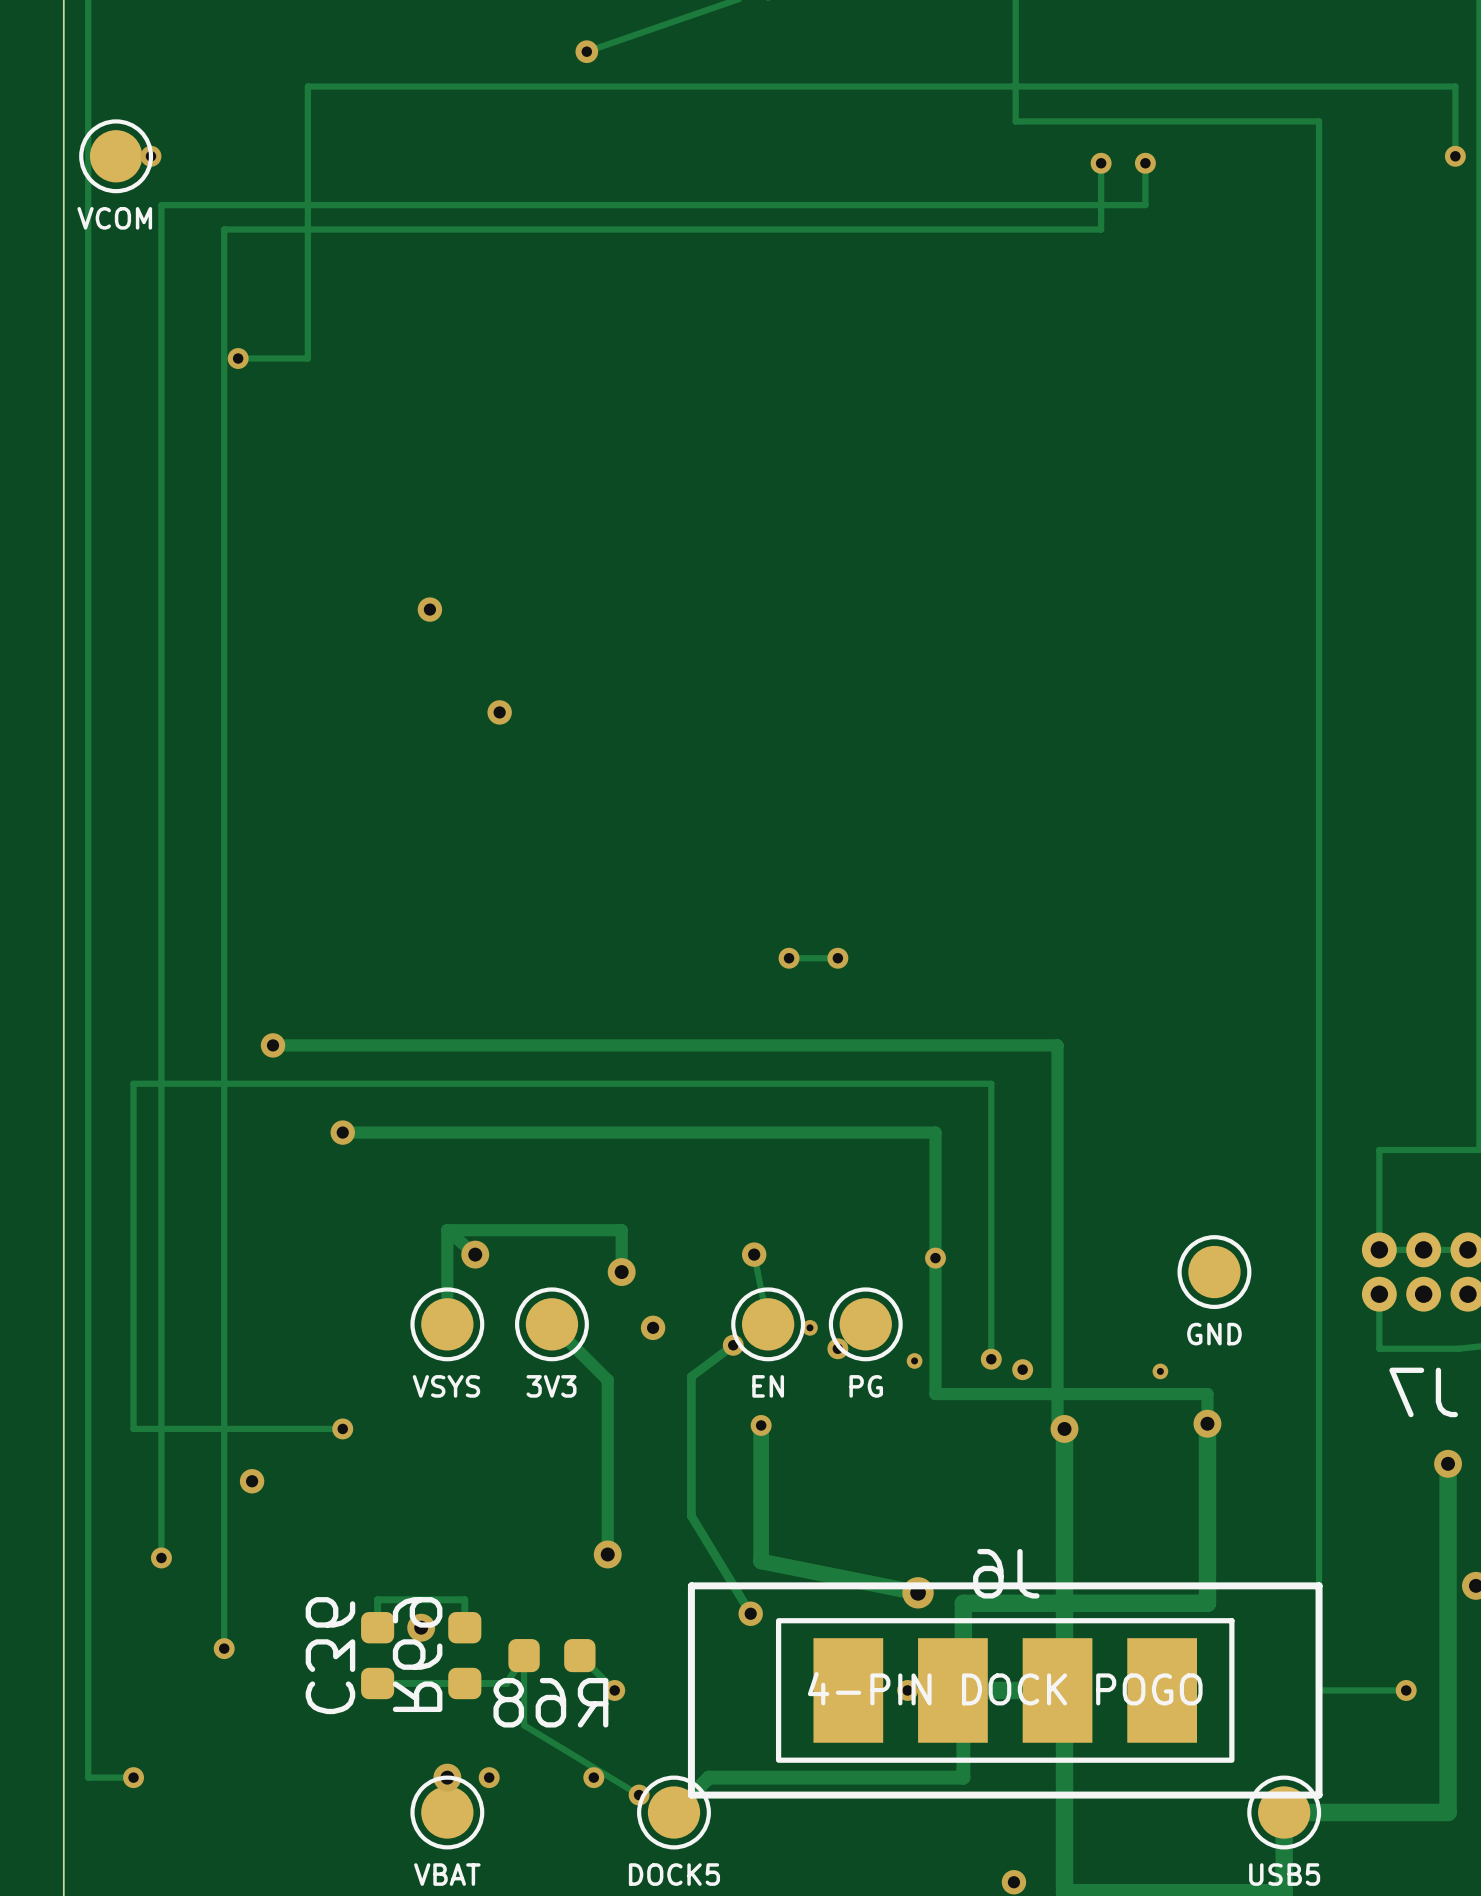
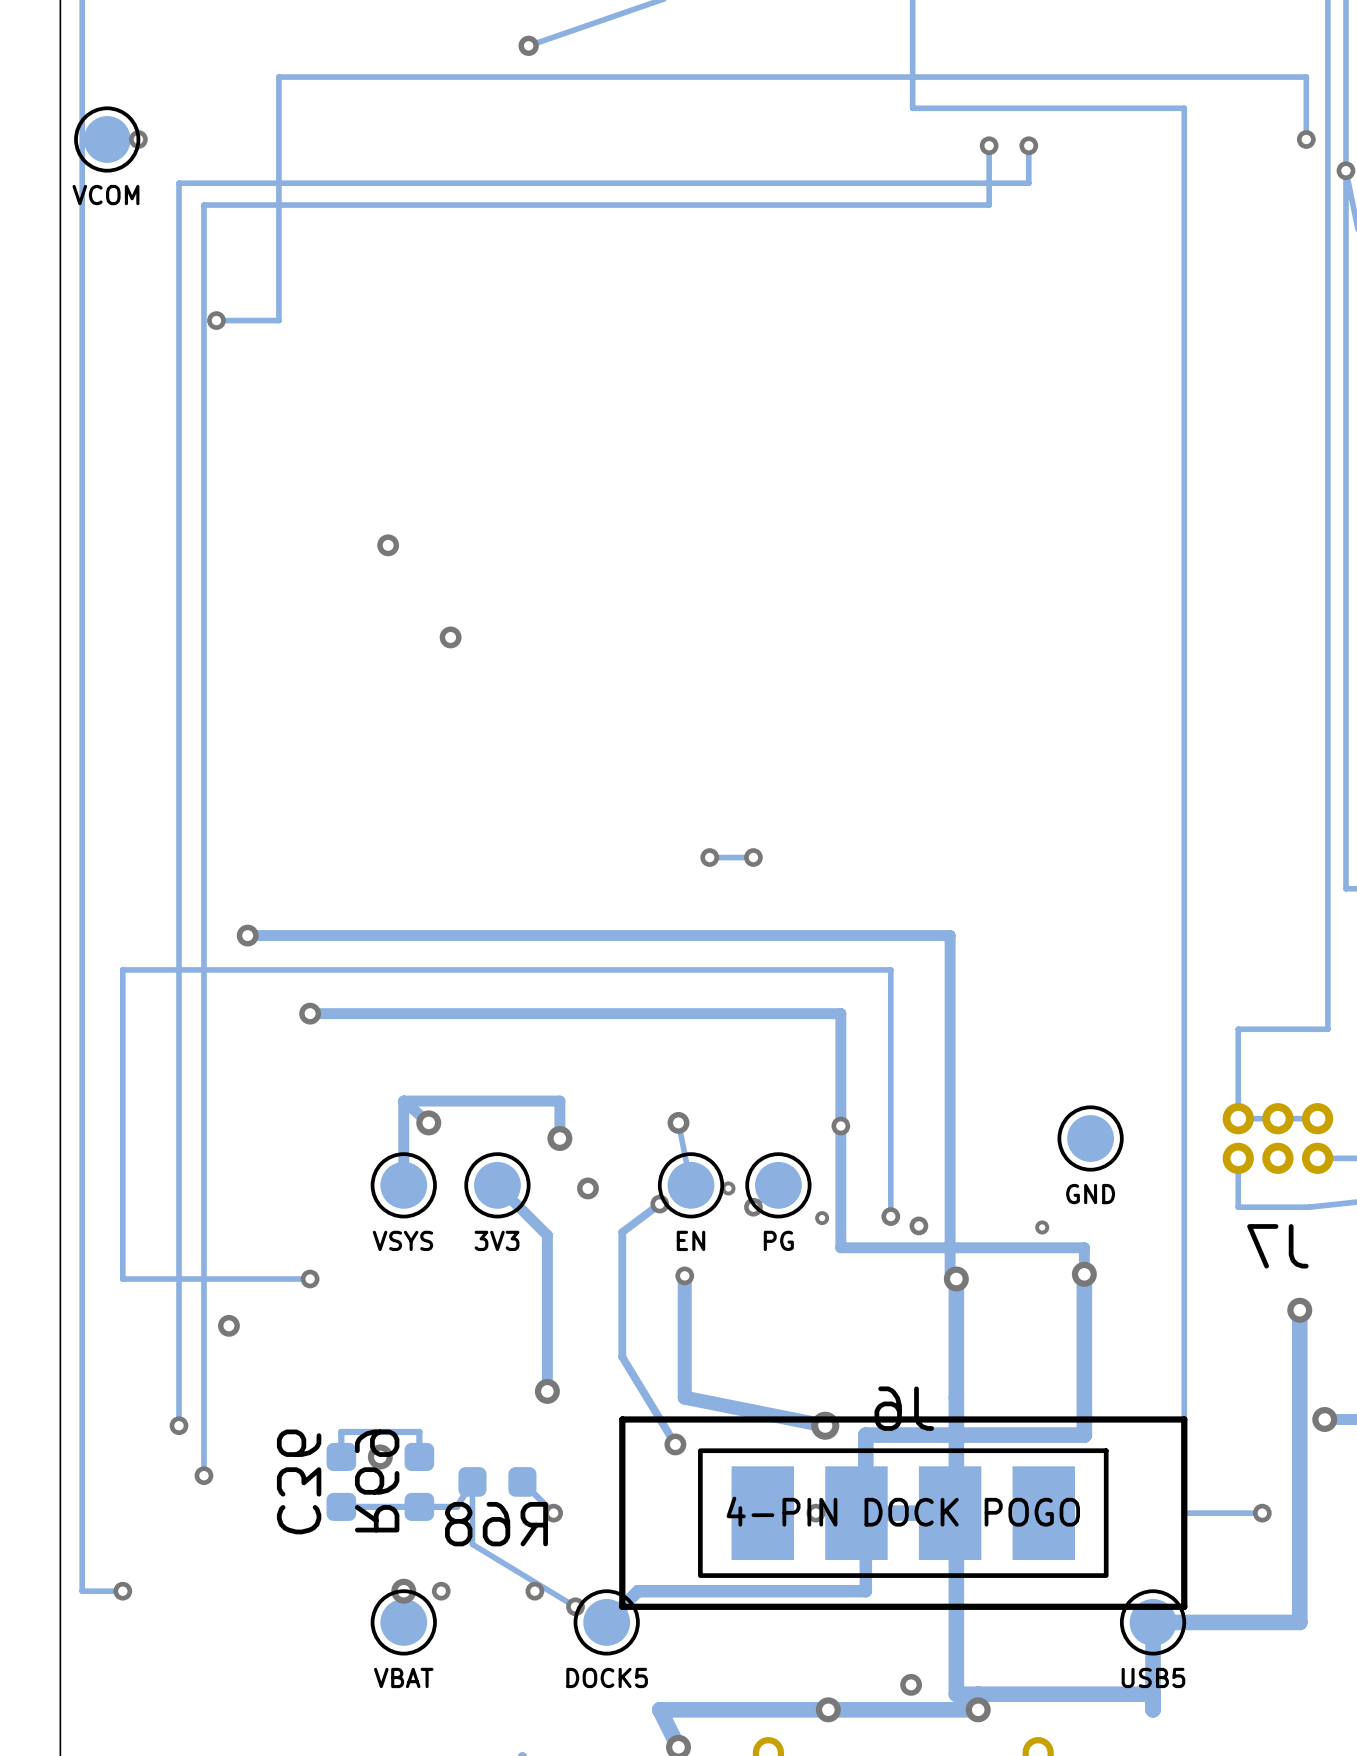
track: (196, 205) (161, 205) (161, 1557) -> (179, 183) (179, 1425)
via position: (161, 1557) -> (179, 1425)

